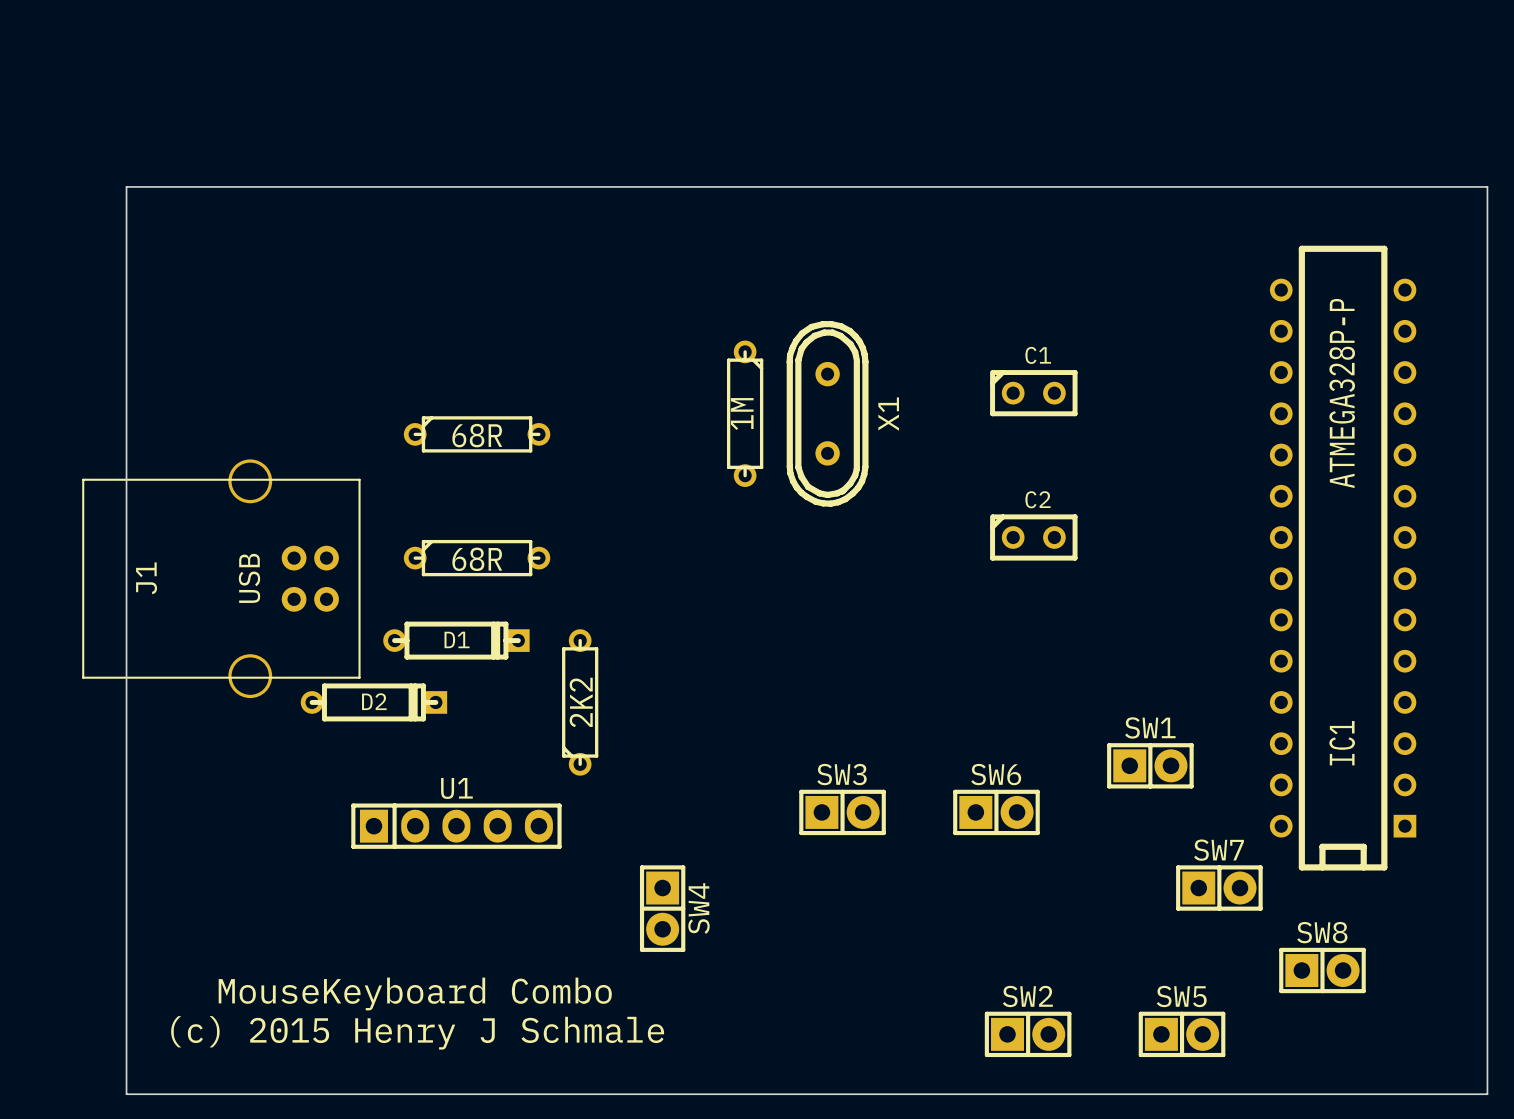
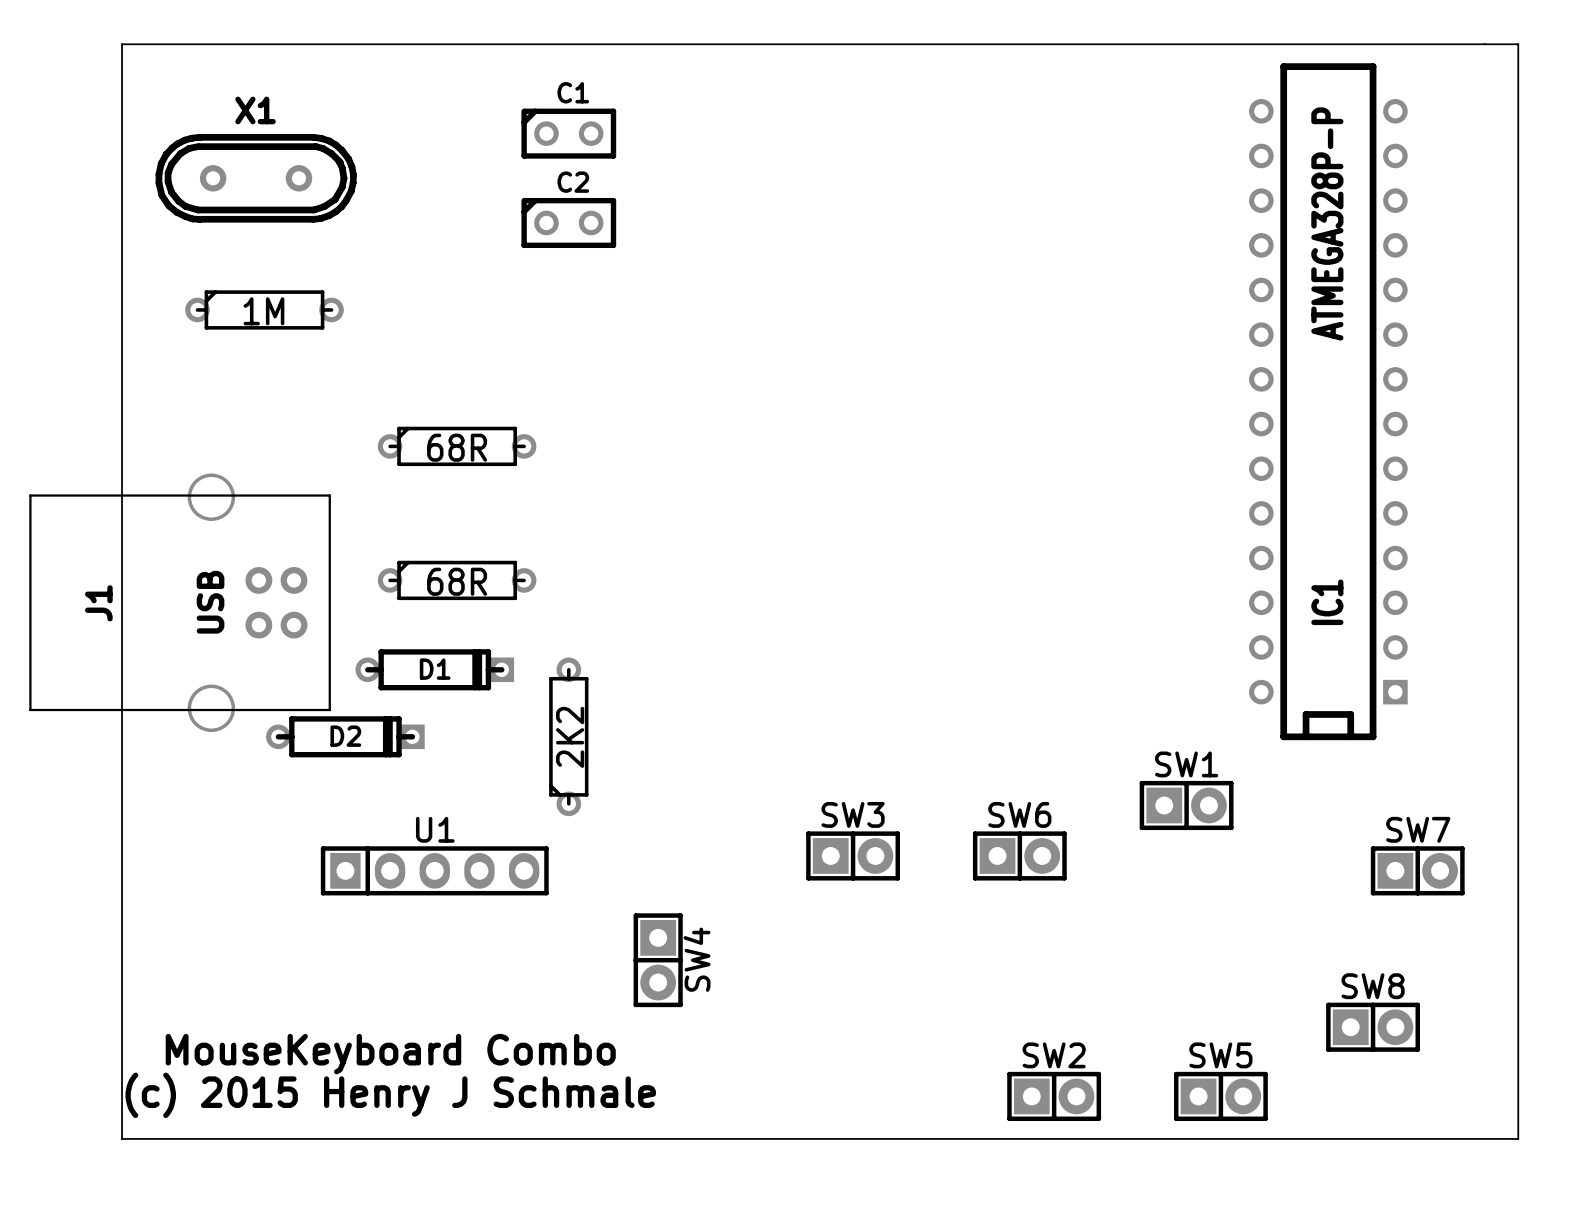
board edge: (126, 186) (126, 1094) (1487, 1094) (1487, 186) (126, 186) -> (122, 44) (122, 1138) (1518, 1138) (1518, 44) (122, 44)
part: none -> 1M (264, 309)
C1 position: (1033, 393) -> (568, 133)
part: 1M (745, 413) -> none
X1 rotation: 0° (827, 413) -> 90° counterclockwise (256, 178)
X1 position: (827, 413) -> (256, 178)
C2 position: (1033, 537) -> (568, 222)
IC1 position: (1343, 558) -> (1328, 401)
SW7 position: (1219, 888) -> (1417, 870)

